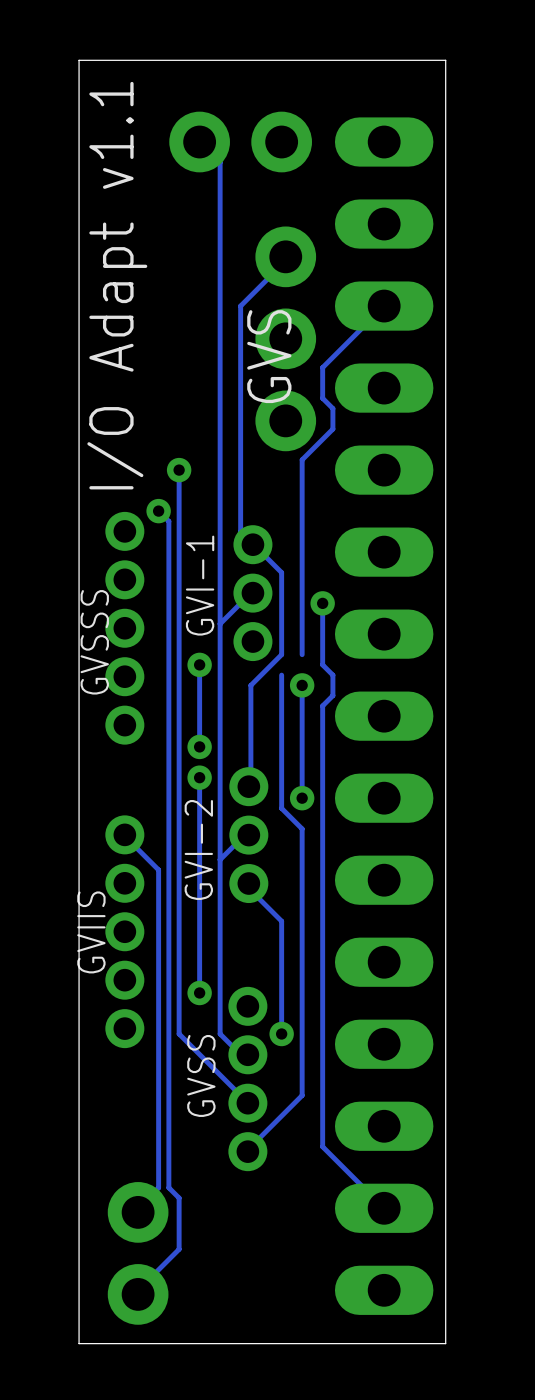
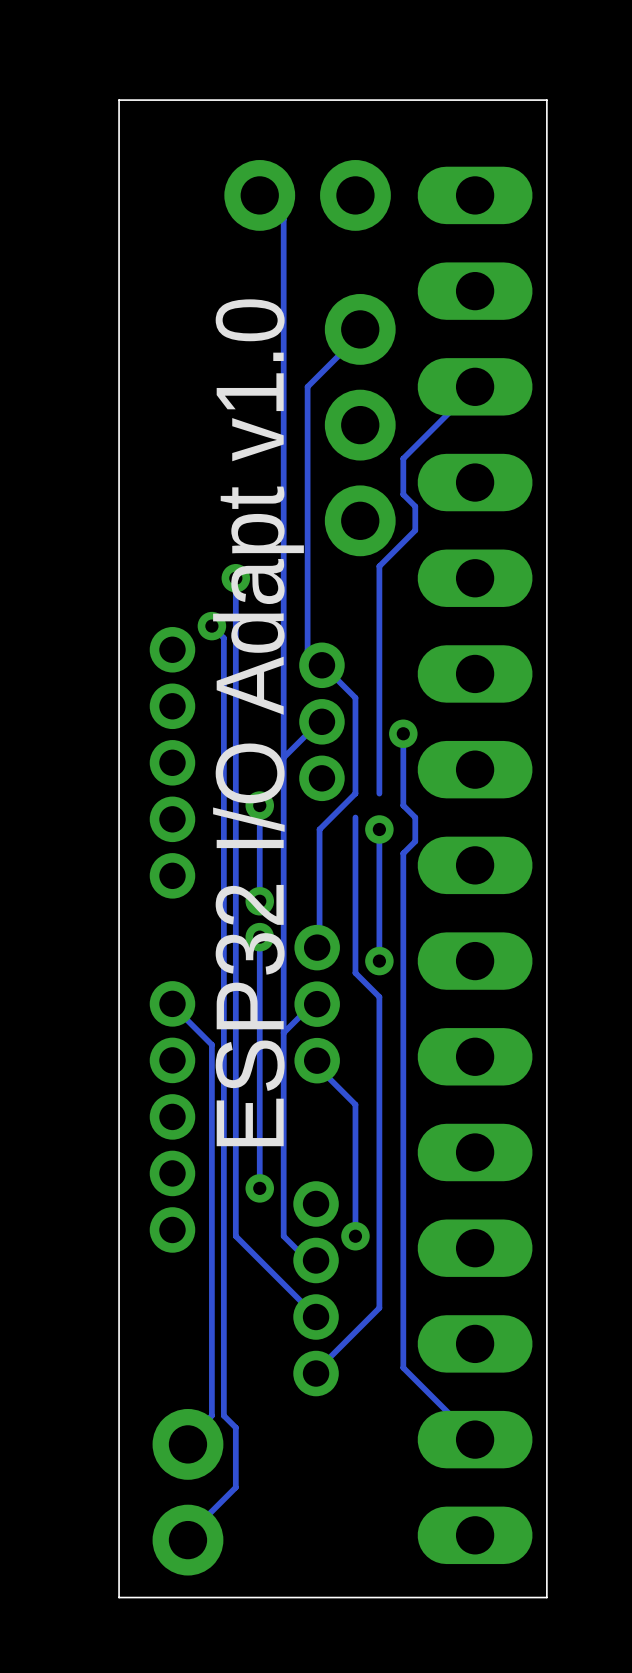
text: I/O Adapt v1.1 (117, 285) -> ESP32 I/O Adapt v1.0 (258, 722)
text: GVS (269, 356) -> none
GVI-1 name: GVI-1 (200, 585) -> none
GVSSS name: GVSSS (94, 642) -> none
part text: GVI-2 (198, 850) -> none
GVIIS name: GVIIS (91, 932) -> none
GVSS name: GVSS (201, 1075) -> none

